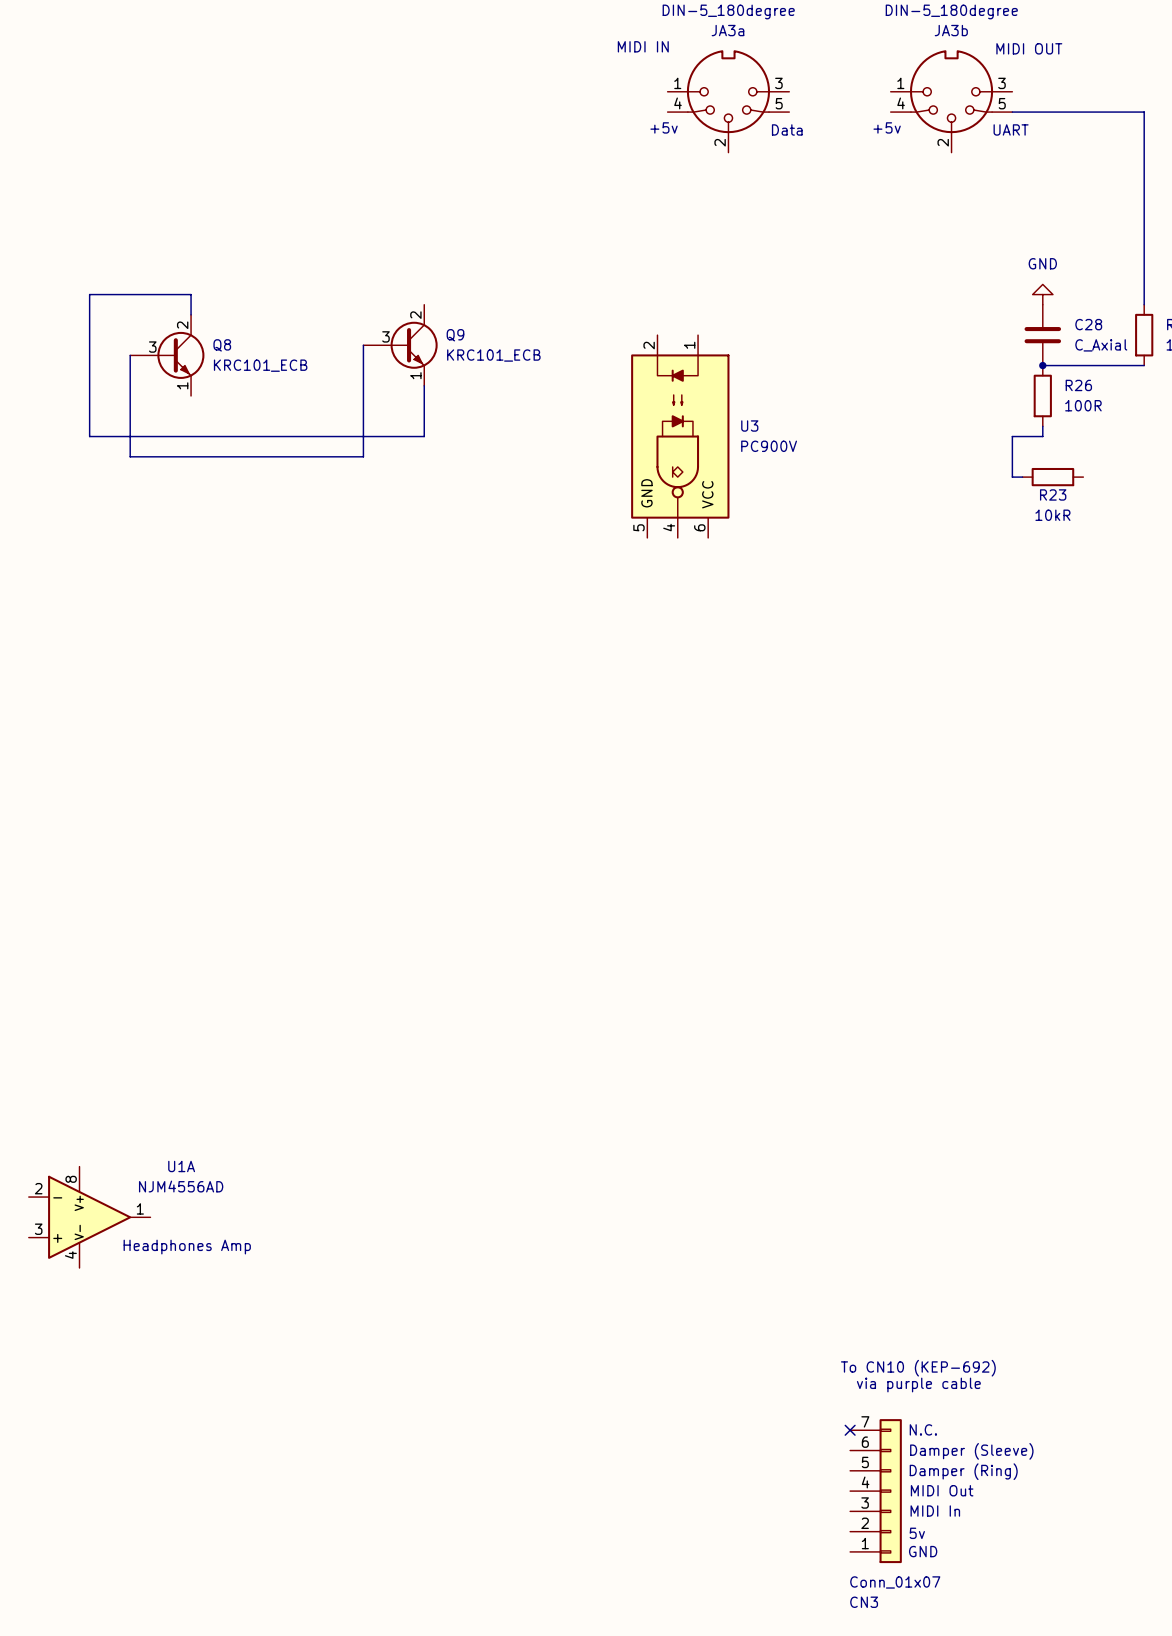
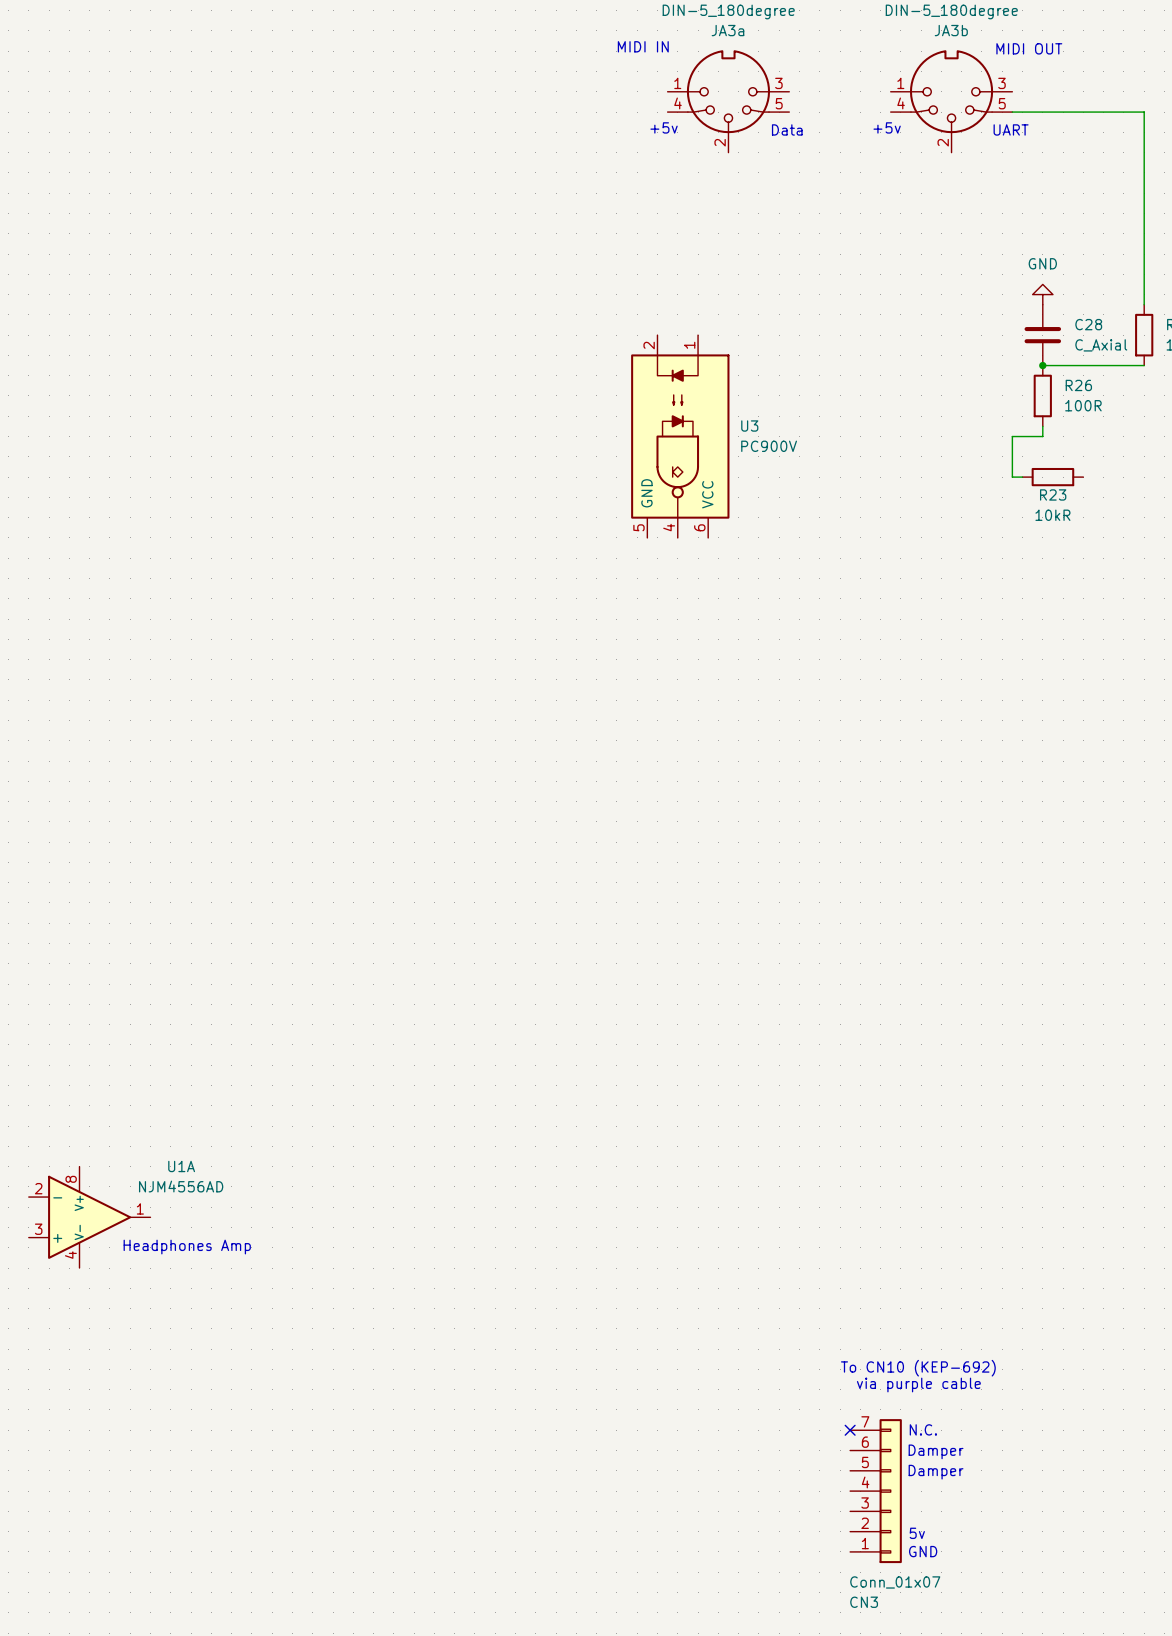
wire: (191, 314) (191, 294) (89, 294) (89, 436) (424, 436) (424, 385) -> none
wire: (363, 345) (363, 456) (130, 456) (130, 355) -> none
Q9: KRC101_ECB (400, 345) -> none
Q8: KRC101_ECB (167, 355) -> none
text: none -> Damper (936, 1451)
text: Damper (Sleeve) (971, 1451) -> none
text: Damper (Ring) (963, 1471) -> none
text: none -> Damper (936, 1472)
text: MIDI Out (942, 1490) -> none
text: MIDI In (935, 1511) -> none

